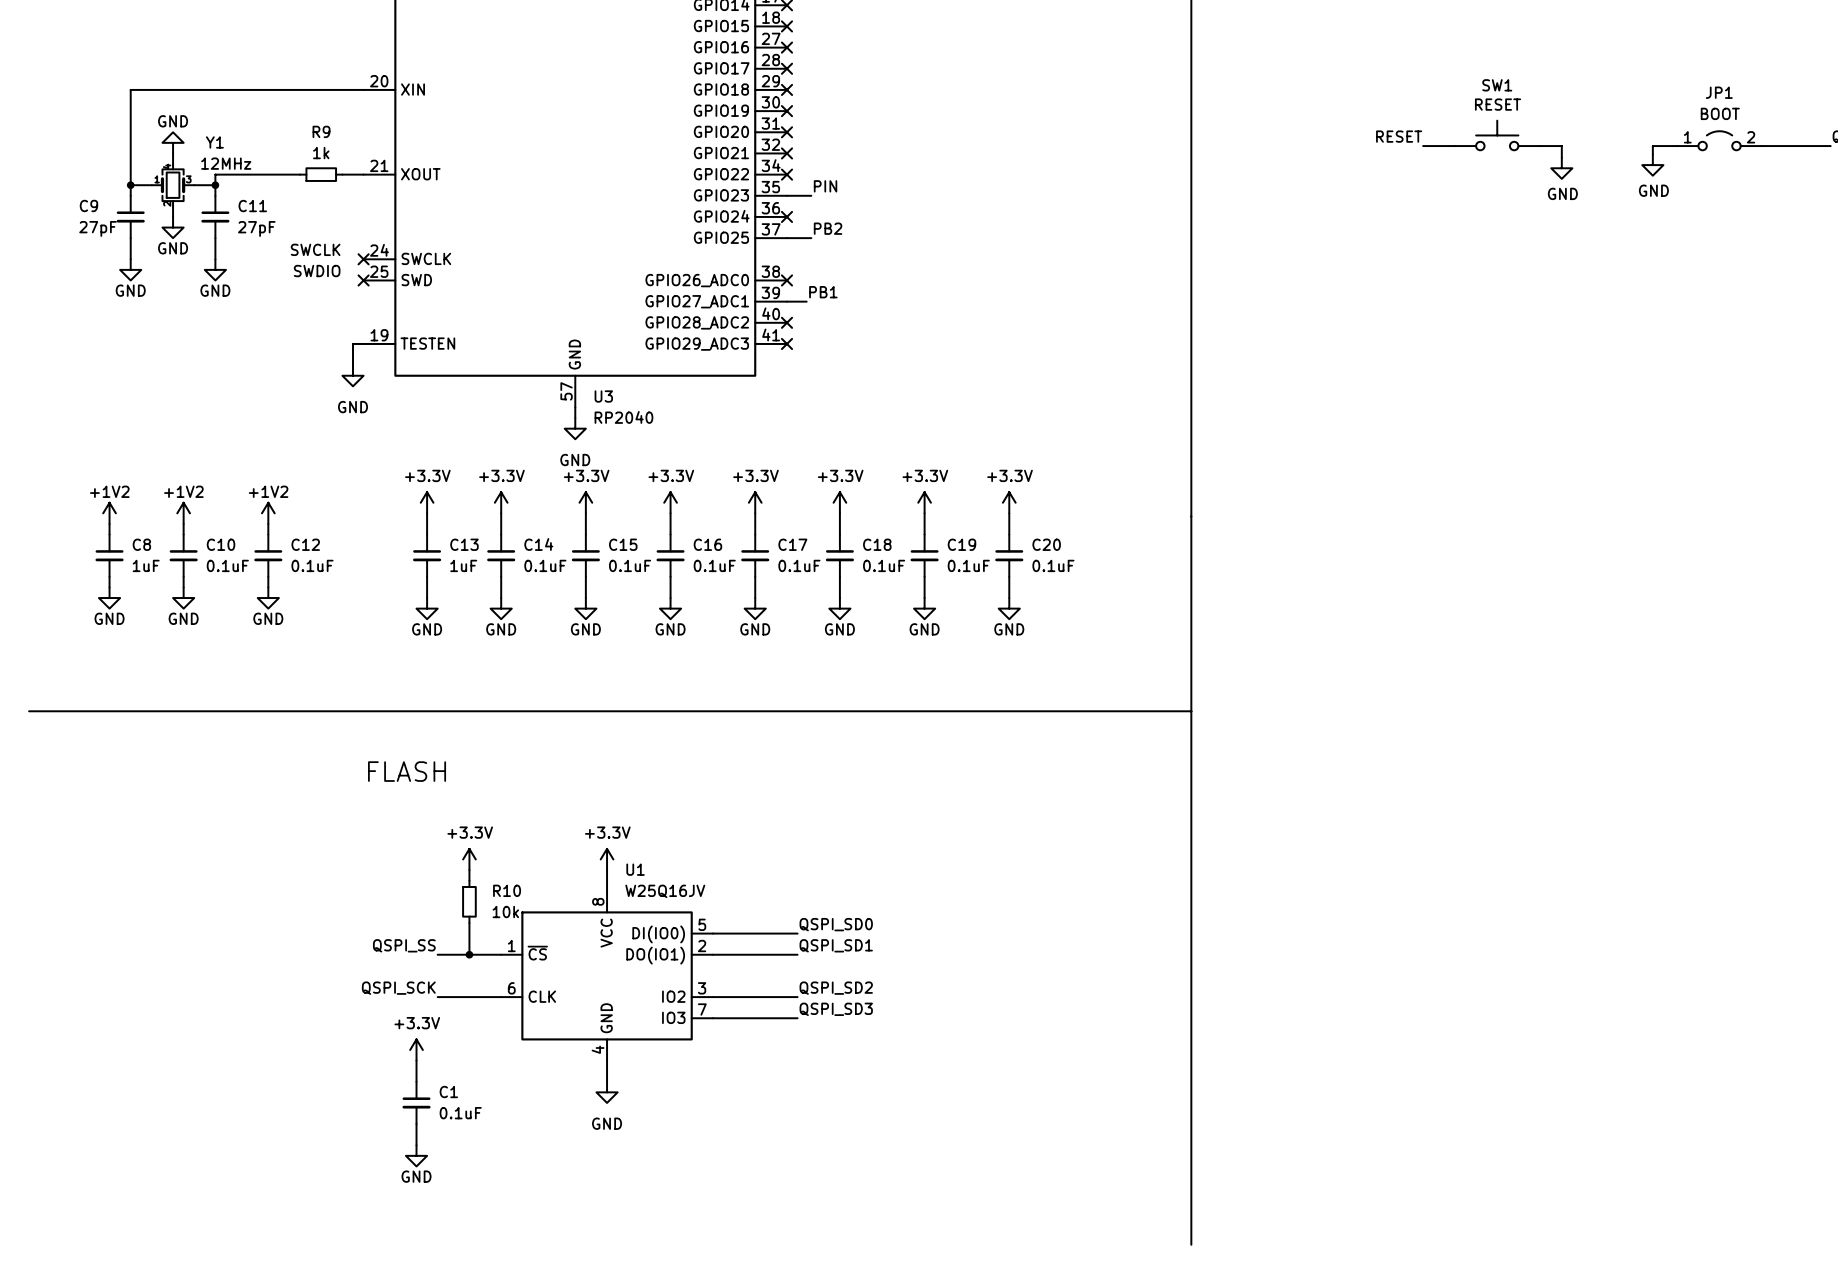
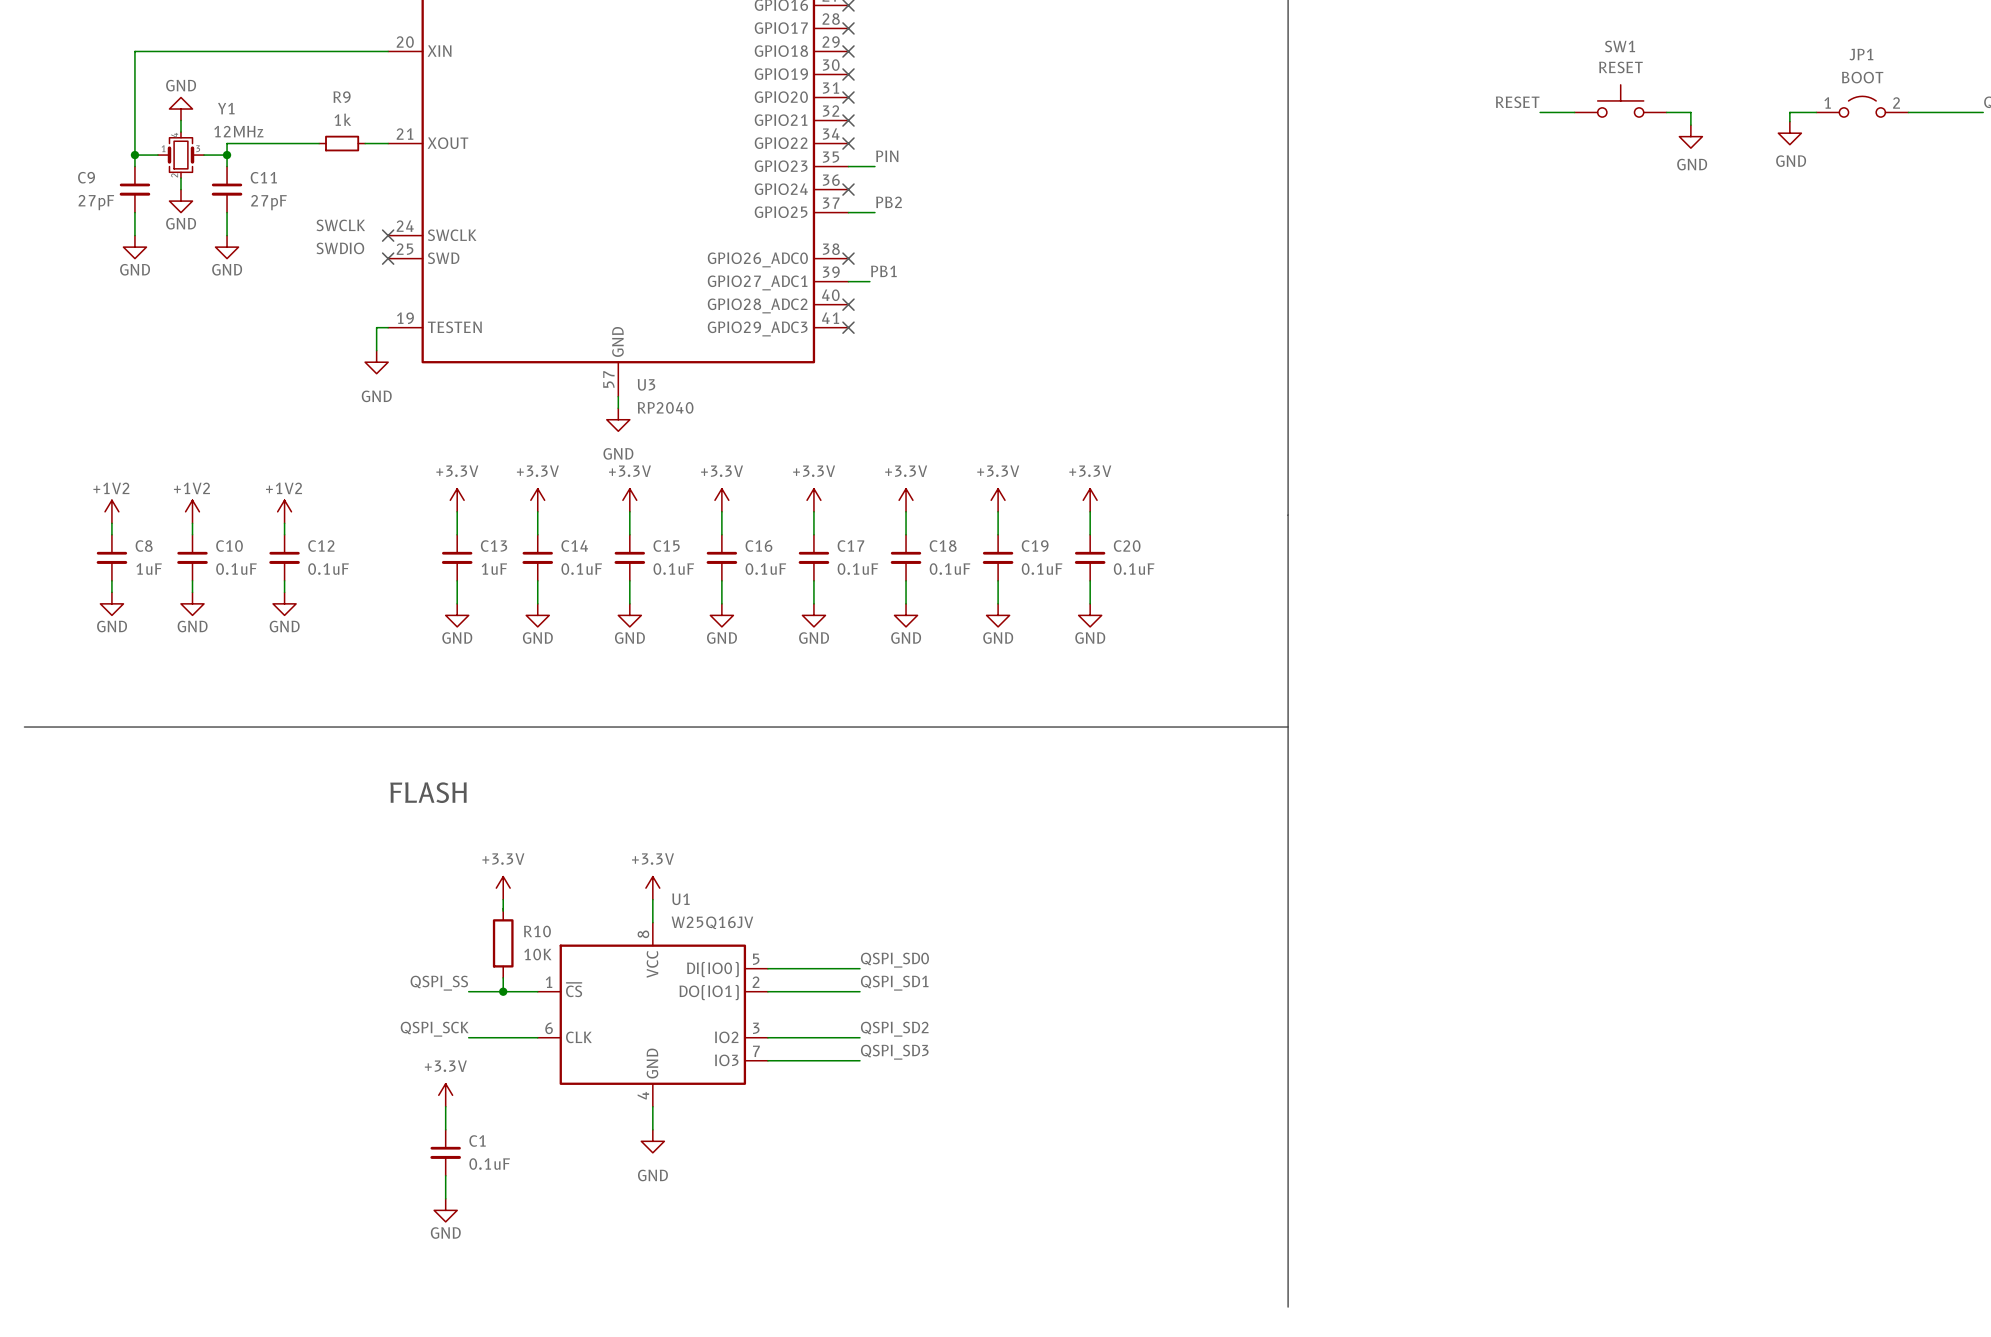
R10 symbol: [462, 880, 477, 923] -> [492, 908, 514, 978]
R10 value: 10k (505, 912) -> 10K (537, 954)

